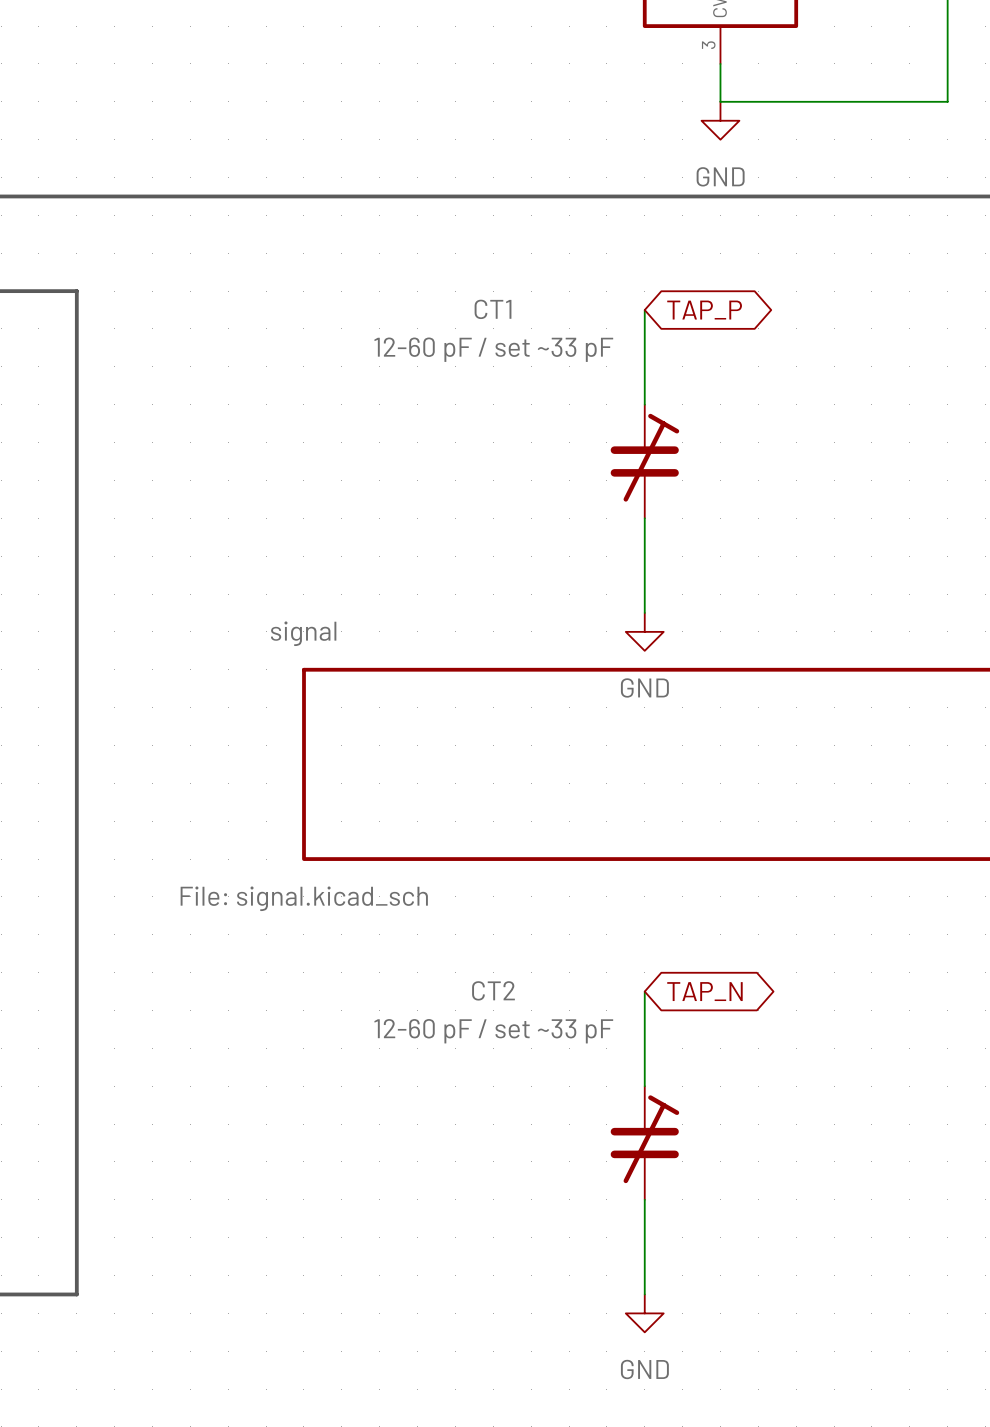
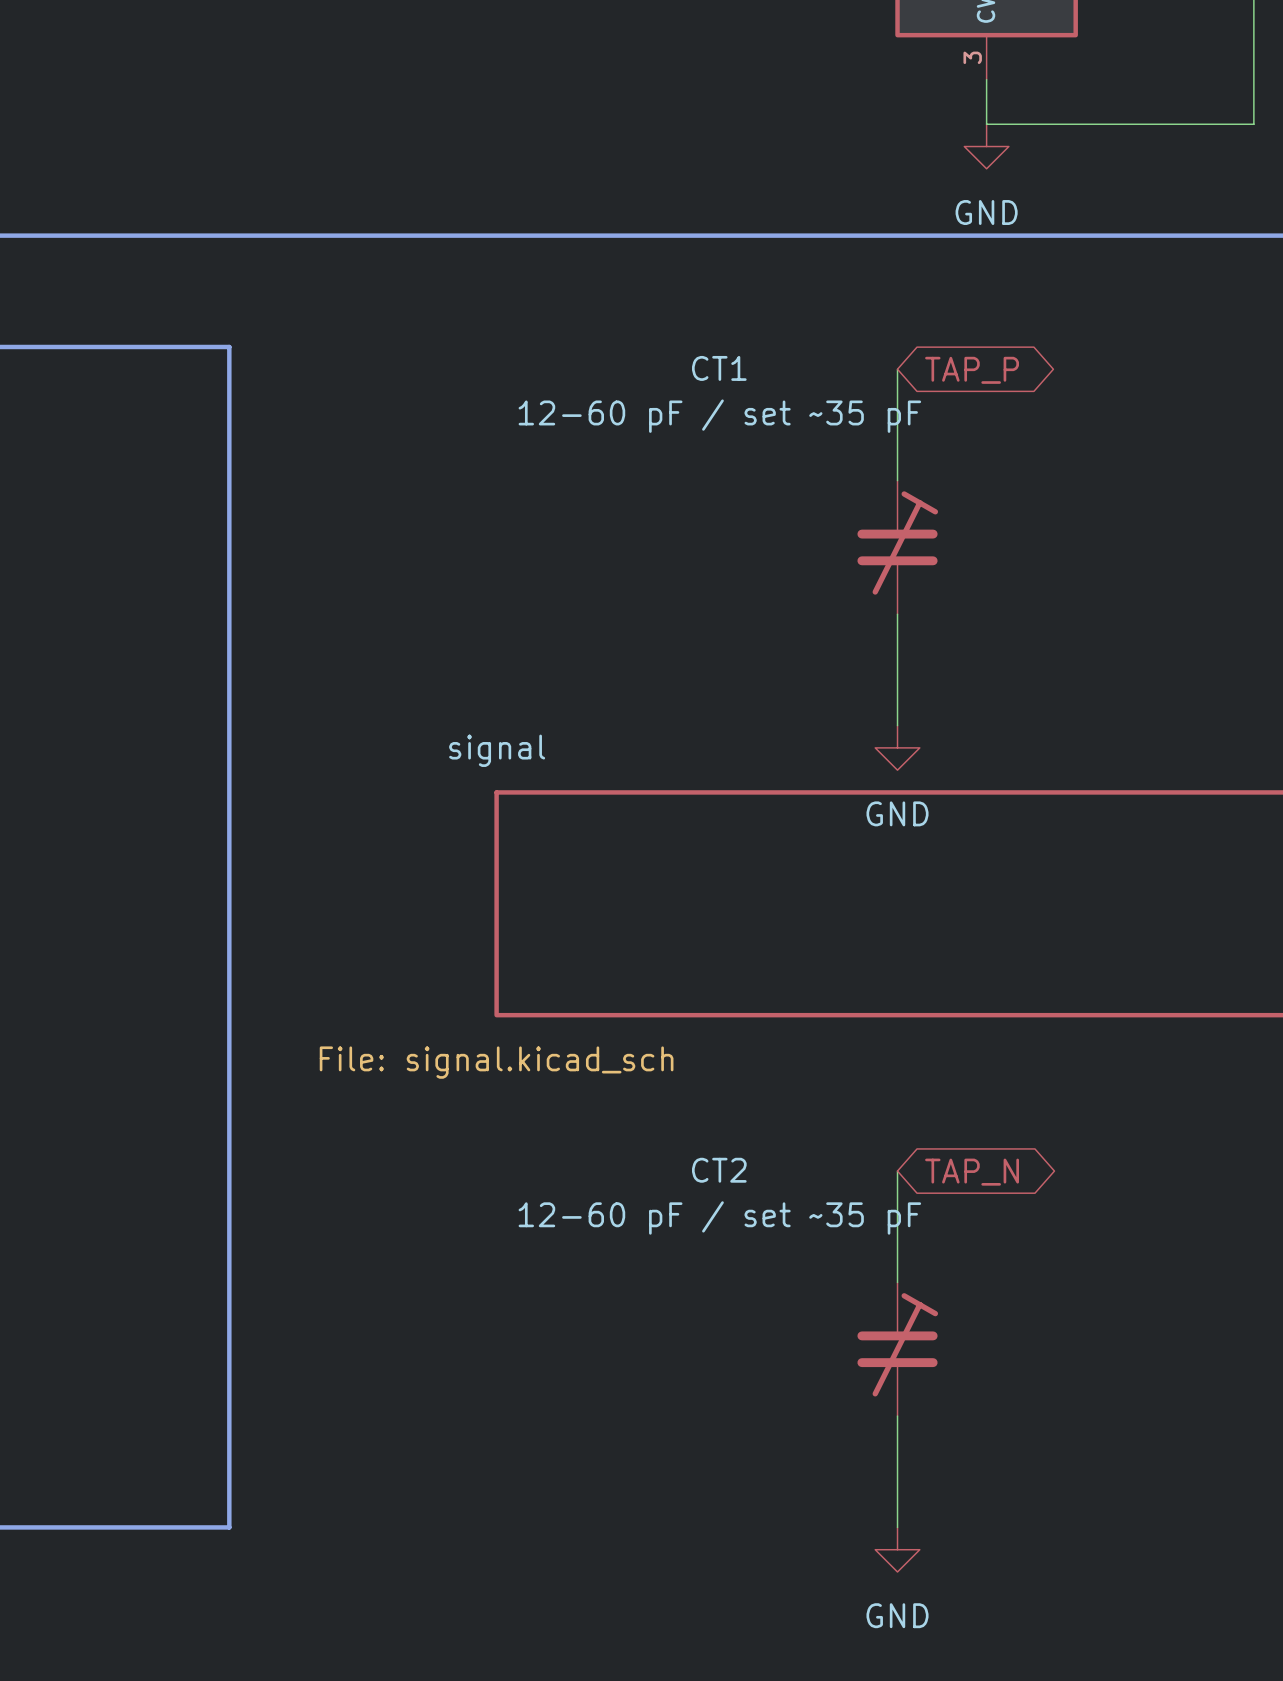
CT1 value: 12-60 pF / set ~33 pF (493, 349) -> 12-60 pF / set ~35 pF (719, 416)
CT2 value: 12-60 pF / set ~33 pF (493, 1031) -> 12-60 pF / set ~35 pF (719, 1217)

